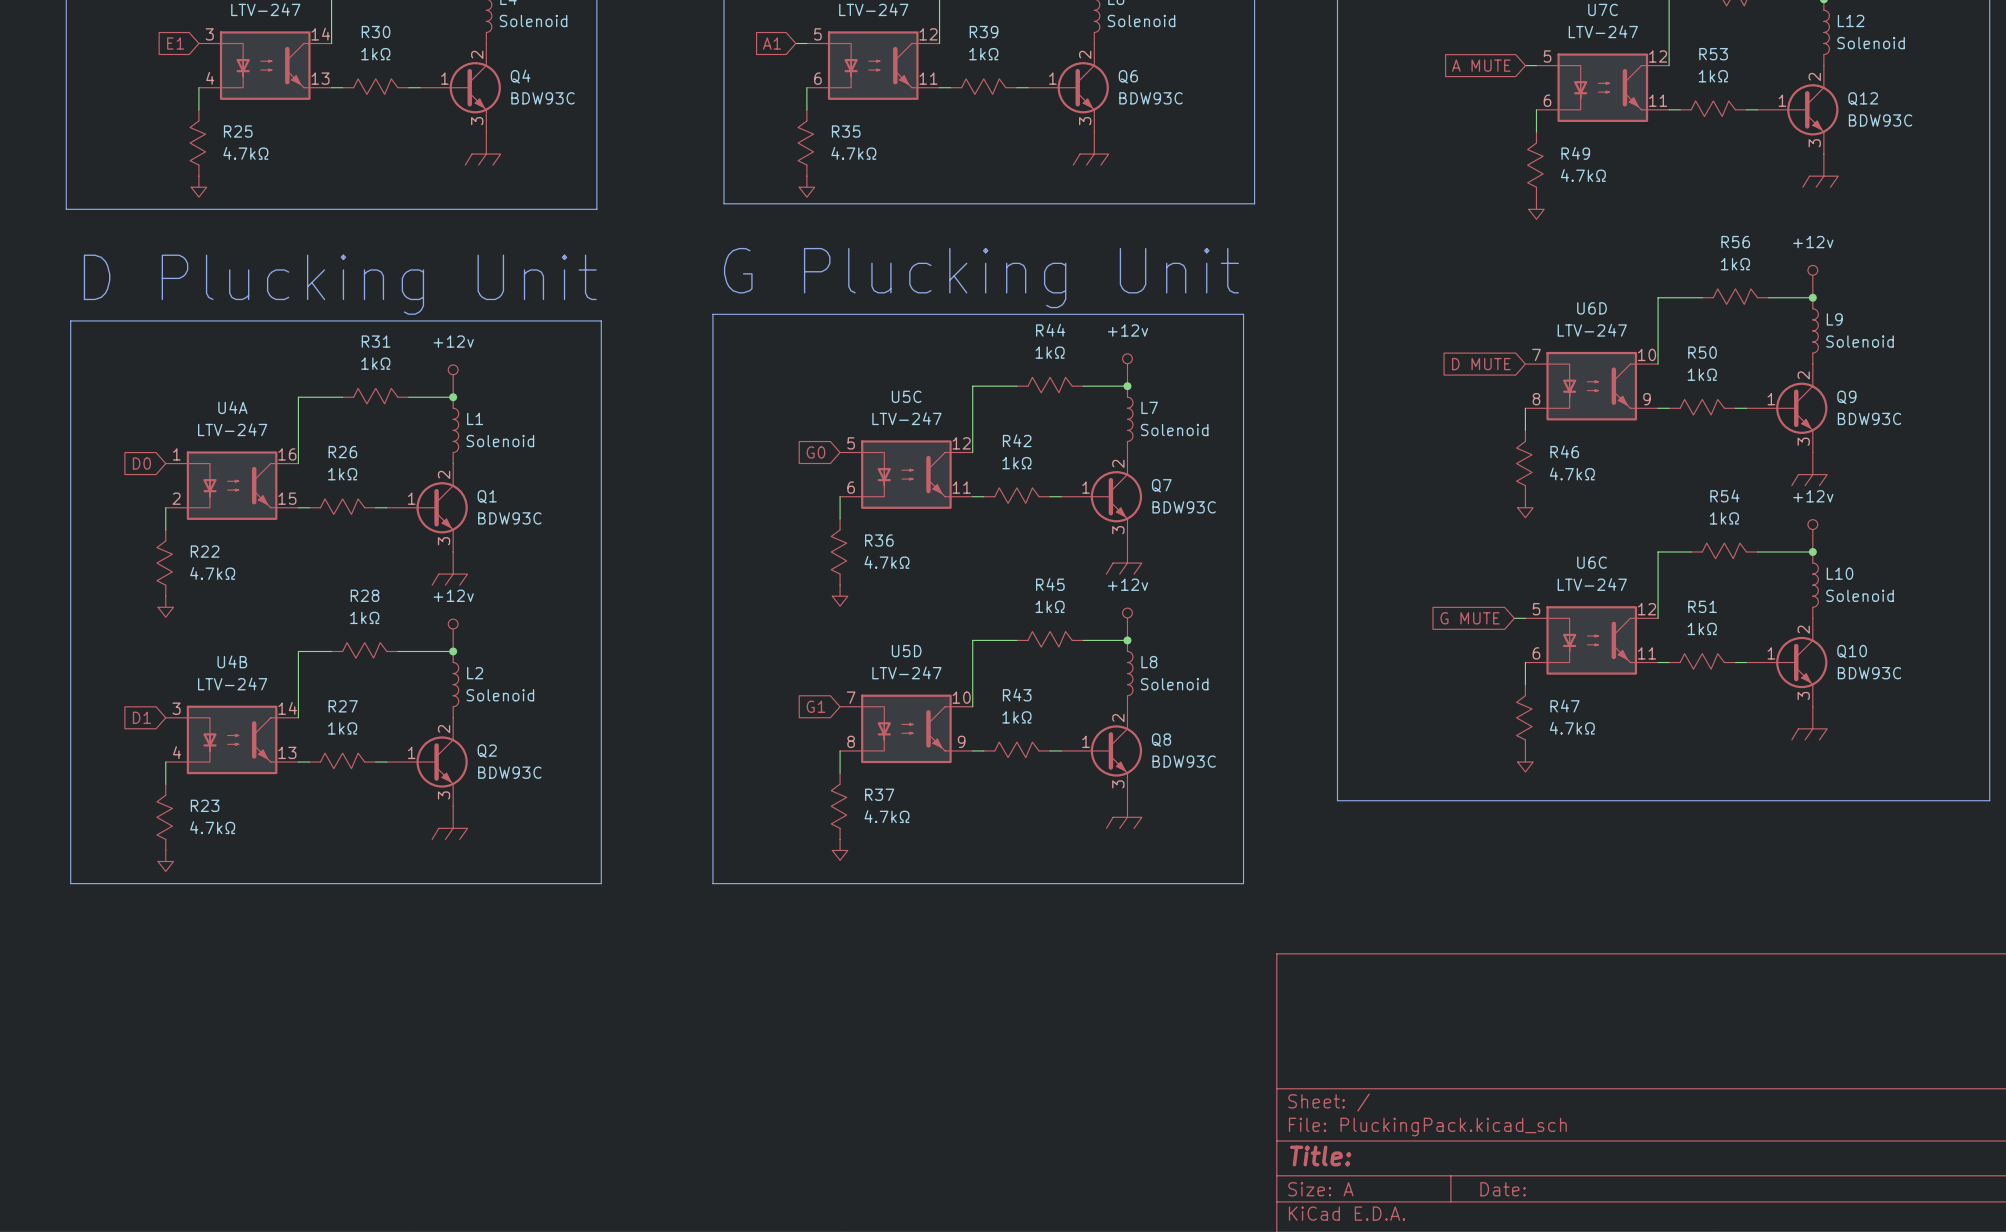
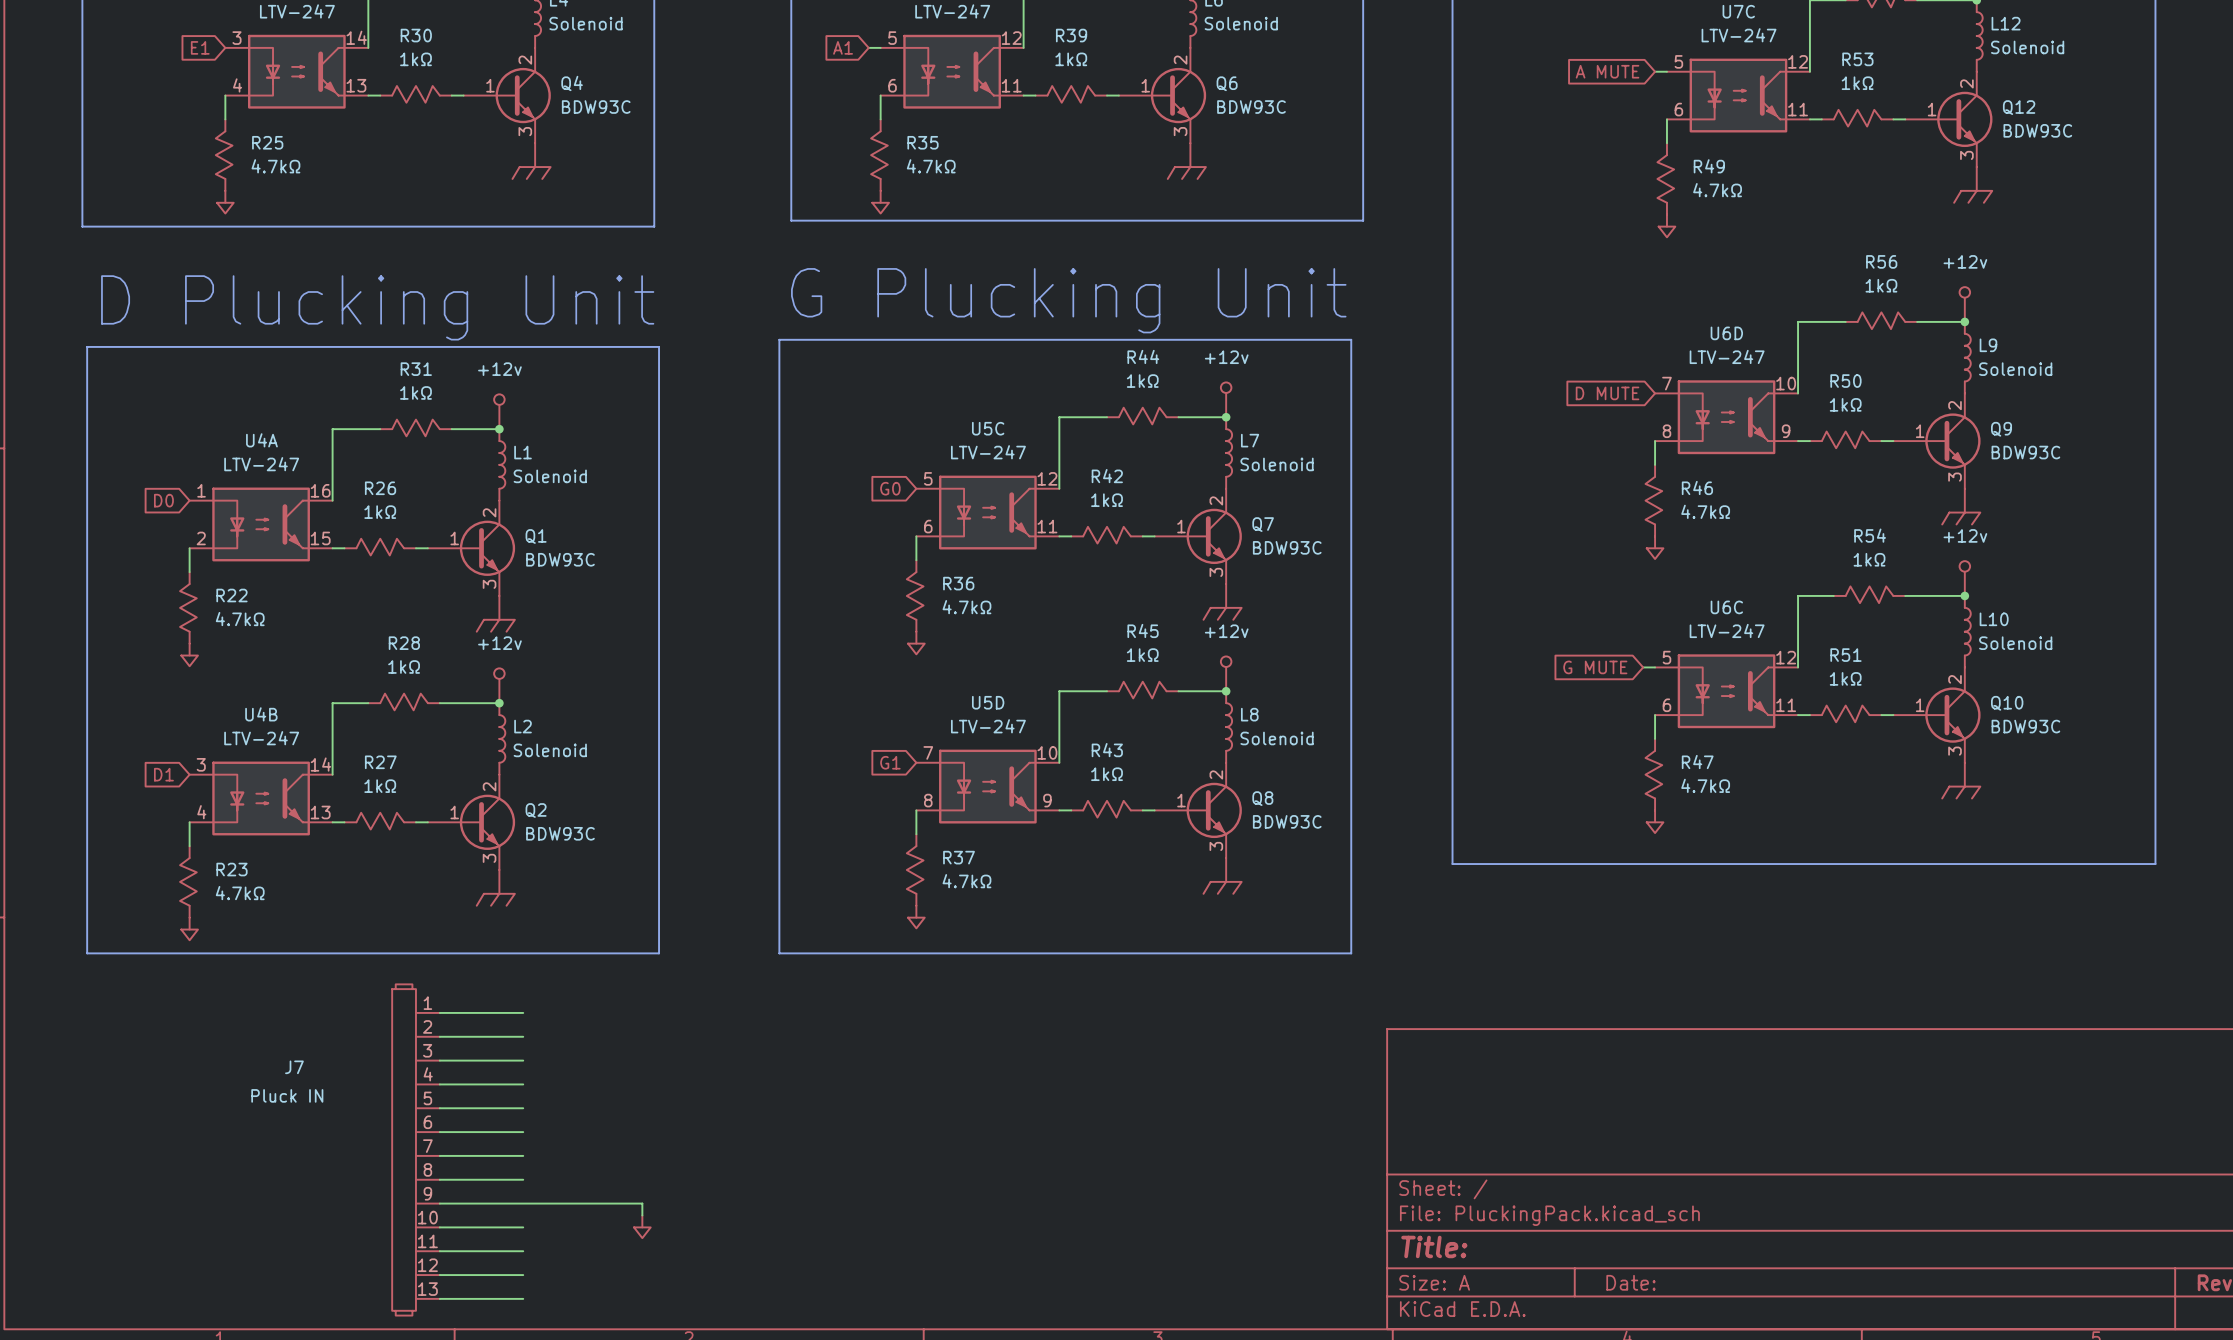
wire: none -> (439, 1012) (523, 1012)
wire: none -> (439, 1036) (523, 1036)
wire: none -> (439, 1060) (523, 1060)
wire: none -> (439, 1084) (523, 1084)
wire: none -> (439, 1108) (523, 1108)
wire: none -> (439, 1132) (523, 1132)
J7: none -> Pluck IN (415, 1149)
wire: none -> (439, 1155) (523, 1155)
wire: none -> (439, 1179) (523, 1179)
wire: none -> (439, 1203) (642, 1203) (642, 1215)
wire: none -> (439, 1227) (523, 1227)
power symbol: none -> (642, 1226)
wire: none -> (439, 1251) (523, 1251)
wire: none -> (439, 1275) (523, 1275)
wire: none -> (439, 1298) (523, 1298)

